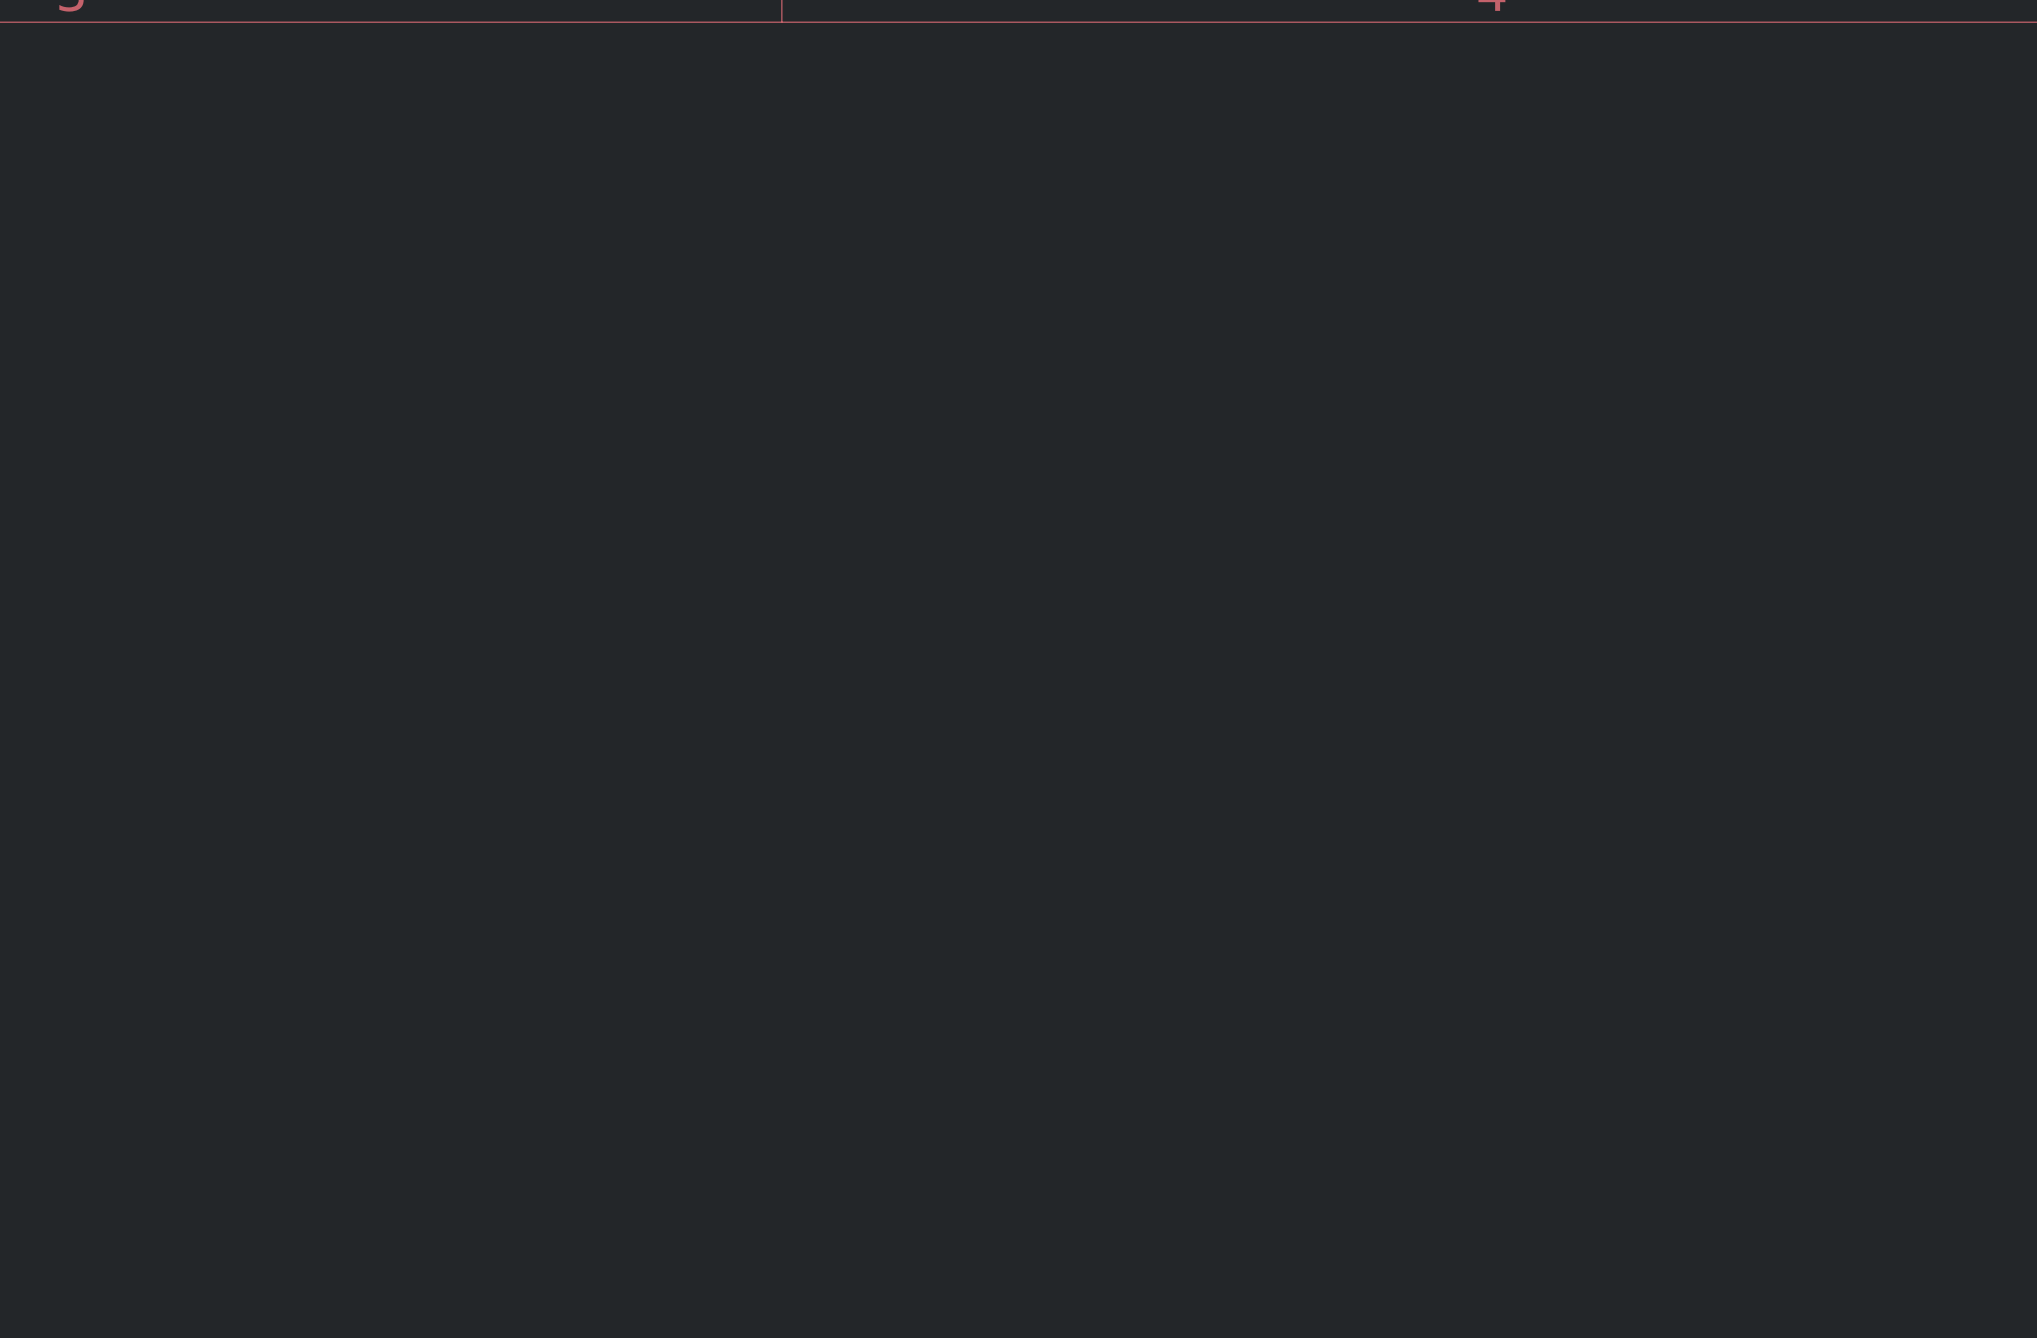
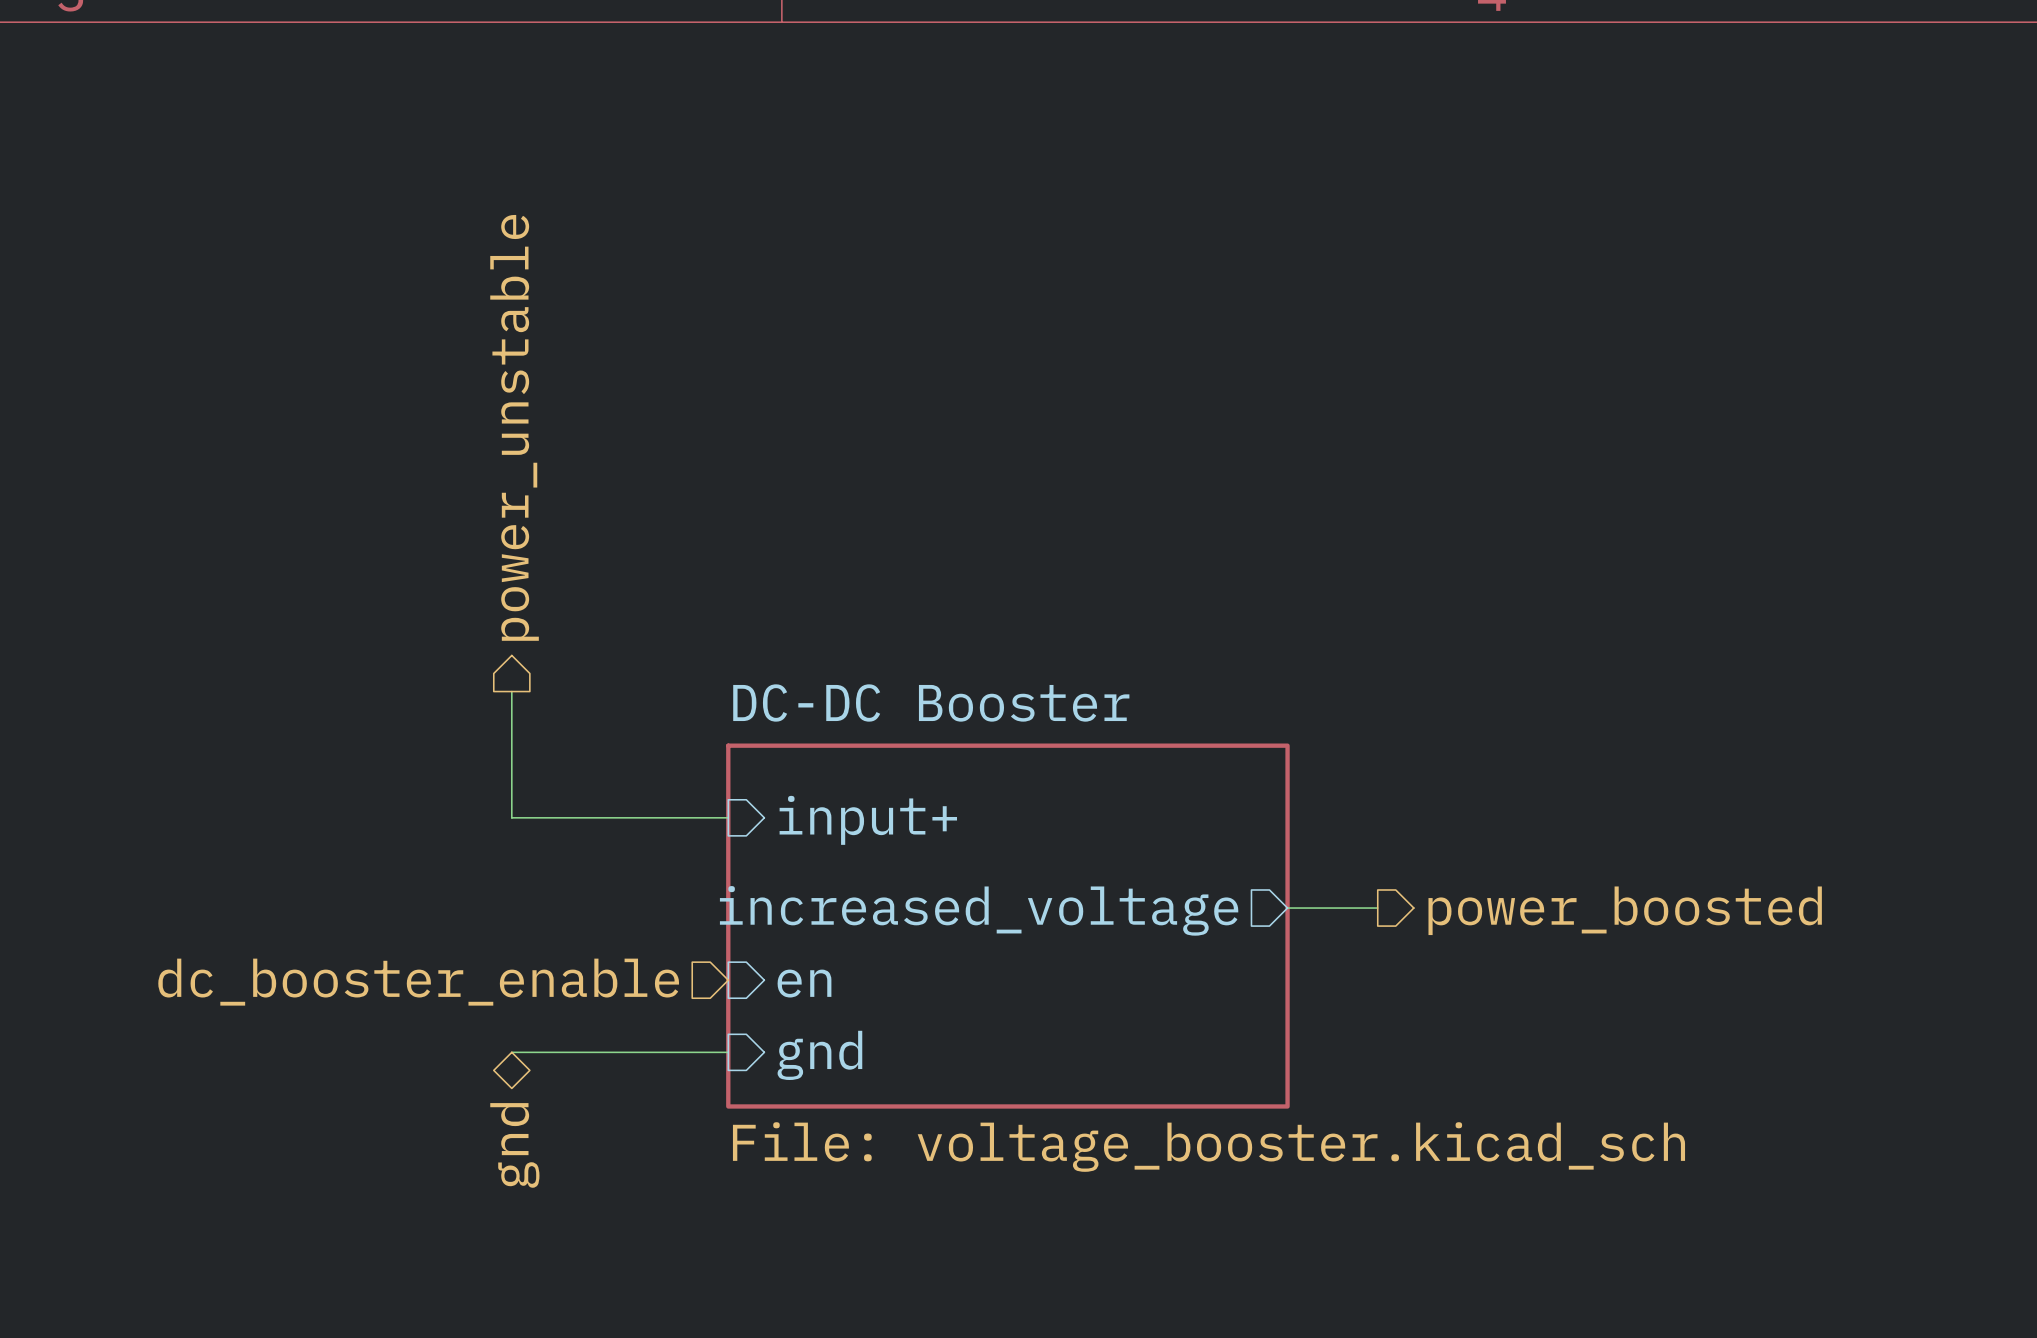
hierarchical label: none -> power_unstable (514, 427)
wire: none -> (511, 691) (511, 817) (728, 817)
sheet pin: none -> input+ (868, 820)
wire: none -> (1287, 908) (1377, 908)
sheet pin: none -> increased_voltage (979, 910)
hierarchical label: none -> power_boosted (1625, 910)
sheet DC-DC Booster: none -> File: voltage_booster.kicad_sch (1007, 926)
hierarchical label: none -> dc_booster_enable (418, 982)
sheet pin: none -> en (804, 983)
wire: none -> (511, 1052) (728, 1052)
sheet pin: none -> gnd (819, 1055)
hierarchical label: none -> gnd (514, 1145)

